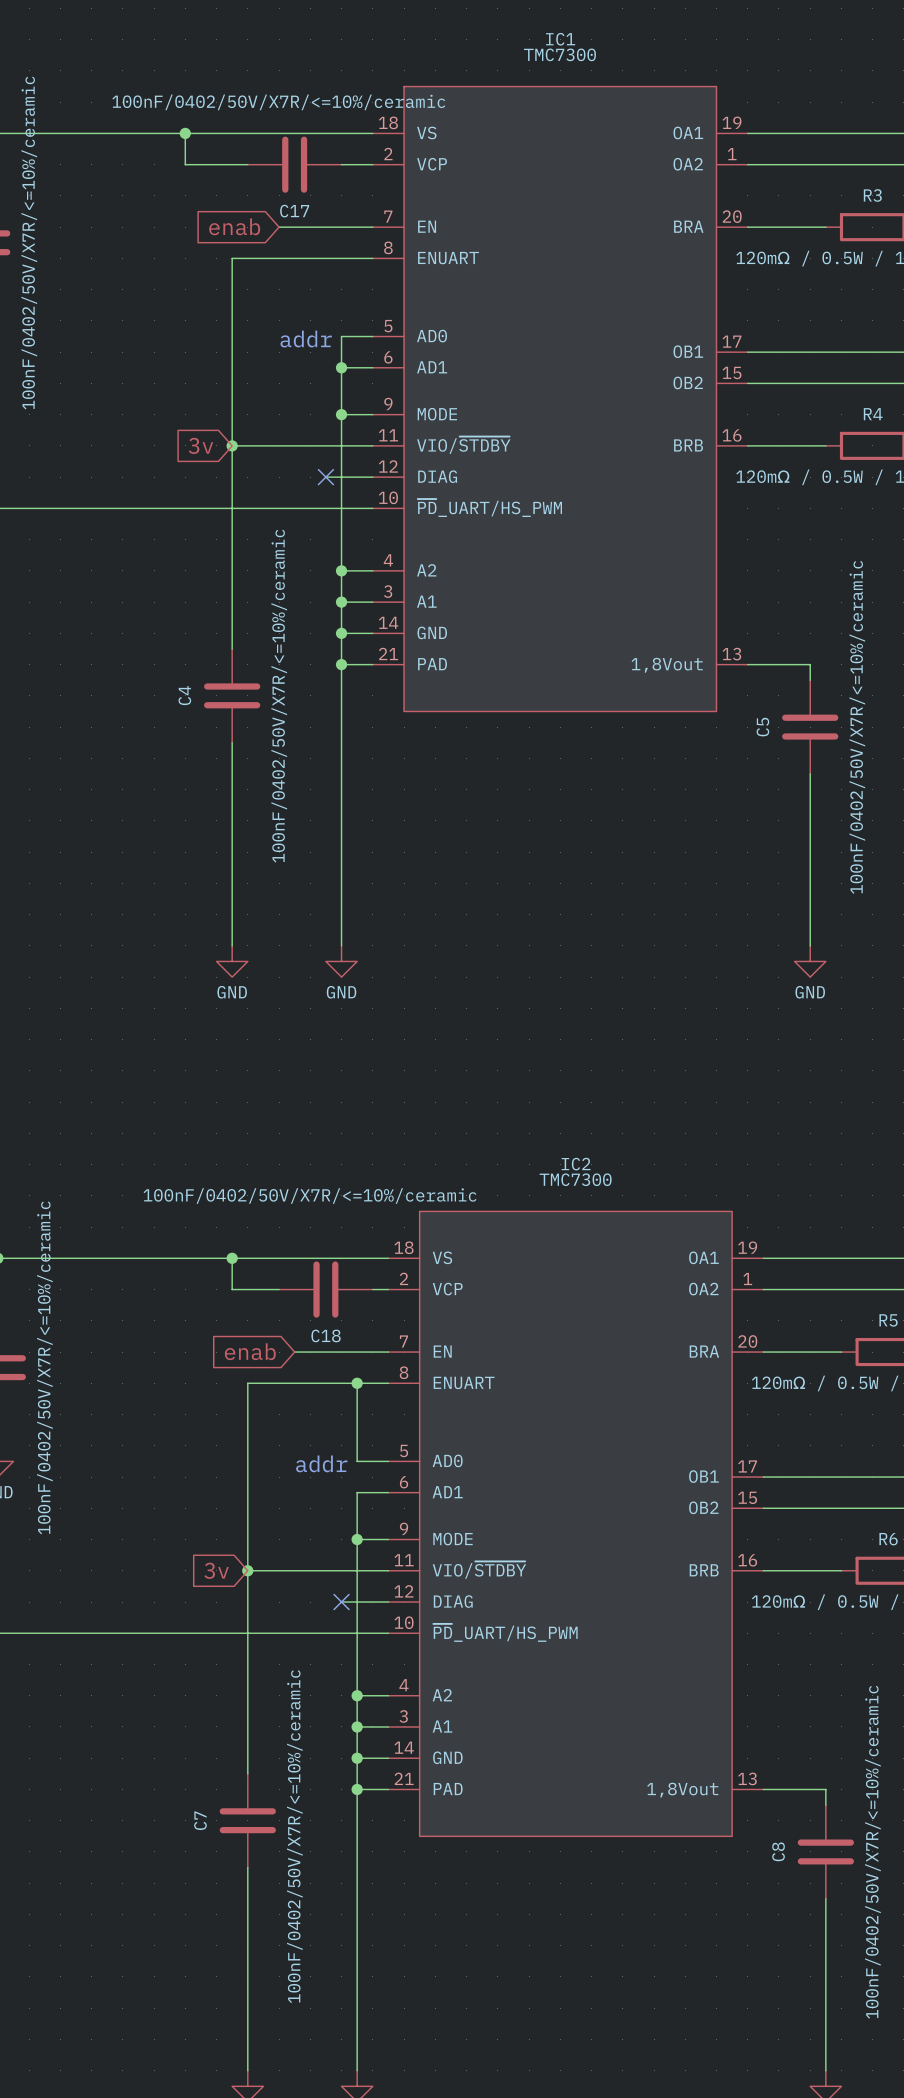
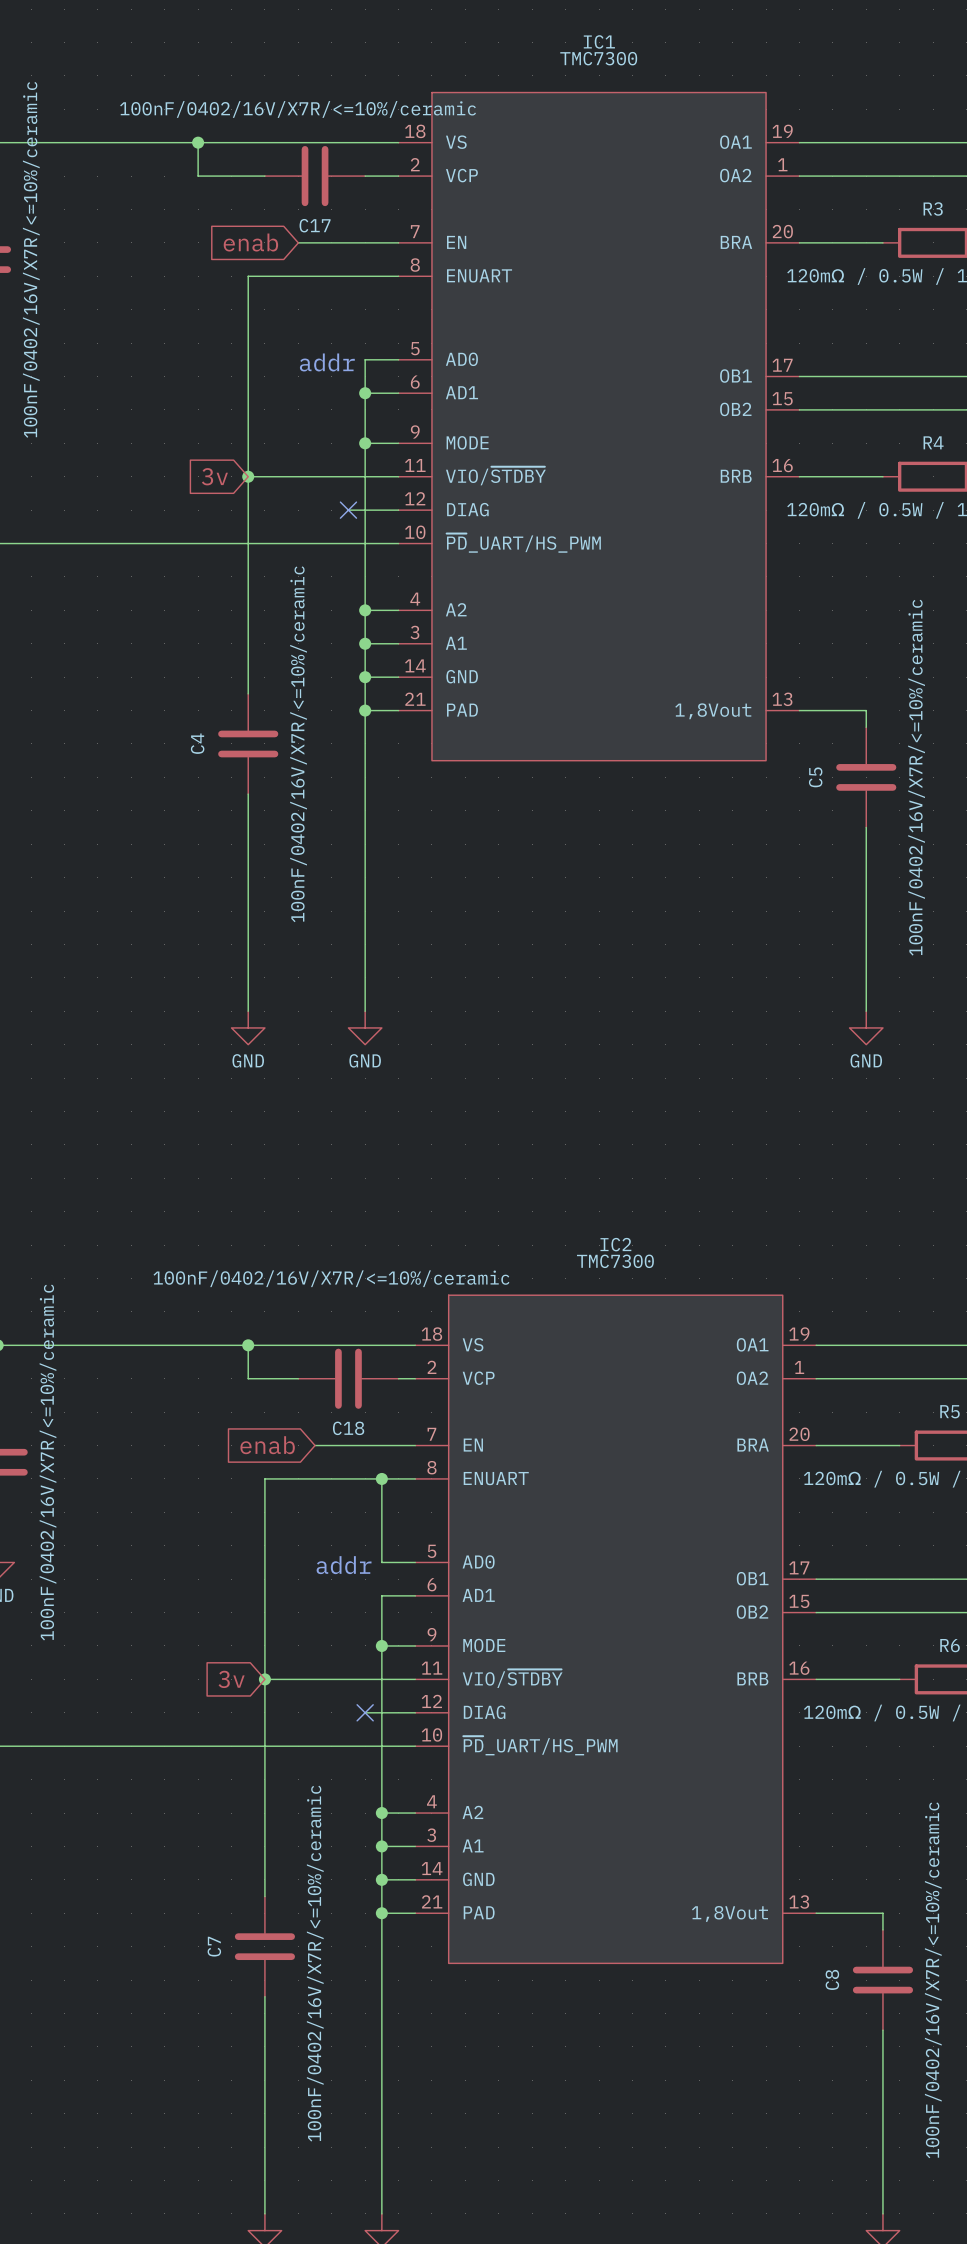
C17 value: 100nF/0402/50V/X7R/<=10%/ceramic (278, 102) -> 100nF/0402/16V/X7R/<=10%/ceramic (298, 109)
part value: 100nF/0402/50V/X7R/<=10%/ceramic (29, 243) -> 100nF/0402/16V/X7R/<=10%/ceramic (31, 259)
C4 value: 100nF/0402/50V/X7R/<=10%/ceramic (279, 696) -> 100nF/0402/16V/X7R/<=10%/ceramic (298, 744)
C5 value: 100nF/0402/50V/X7R/<=10%/ceramic (857, 727) -> 100nF/0402/16V/X7R/<=10%/ceramic (916, 777)
C18 value: 100nF/0402/50V/X7R/<=10%/ceramic (310, 1196) -> 100nF/0402/16V/X7R/<=10%/ceramic (331, 1278)
part value: 100nF/0402/50V/X7R/<=10%/ceramic (44, 1367) -> 100nF/0402/16V/X7R/<=10%/ceramic (48, 1462)
C7 value: 100nF/0402/50V/X7R/<=10%/ceramic (294, 1836) -> 100nF/0402/16V/X7R/<=10%/ceramic (315, 1963)
C8 value: 100nF/0402/50V/X7R/<=10%/ceramic (872, 1852) -> 100nF/0402/16V/X7R/<=10%/ceramic (933, 1980)

